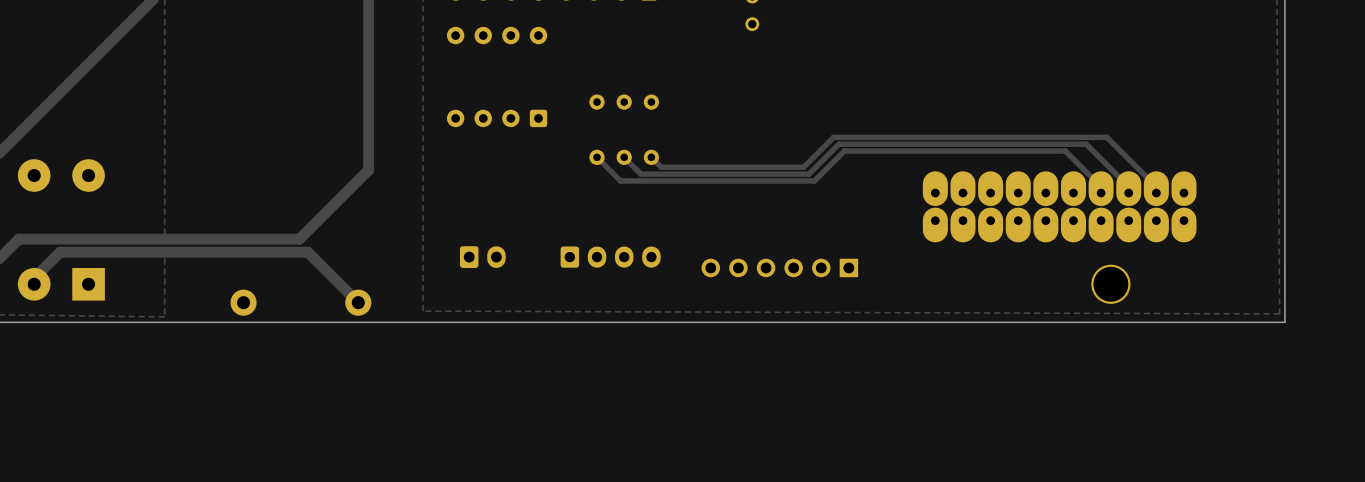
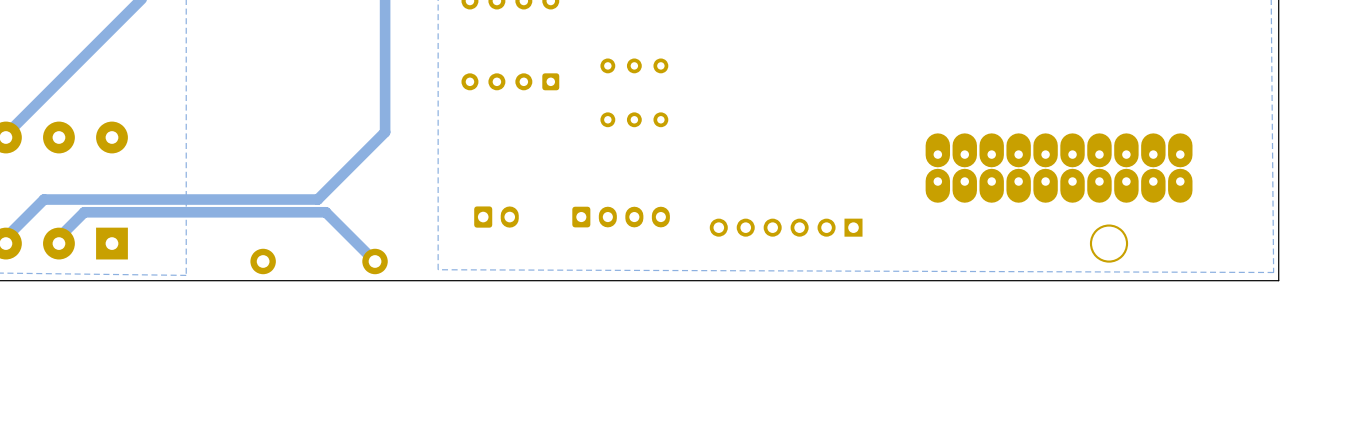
track: (597, 157) (620, 180) (814, 180) (844, 151) (1065, 151) (1101, 186) (1101, 193) -> none
track: (624, 157) (640, 174) (809, 174) (839, 144) (1086, 144) (1128, 186) (1128, 193) -> none
track: (651, 157) (661, 167) (803, 167) (833, 137) (1106, 137) (1156, 186) (1156, 193) -> none

